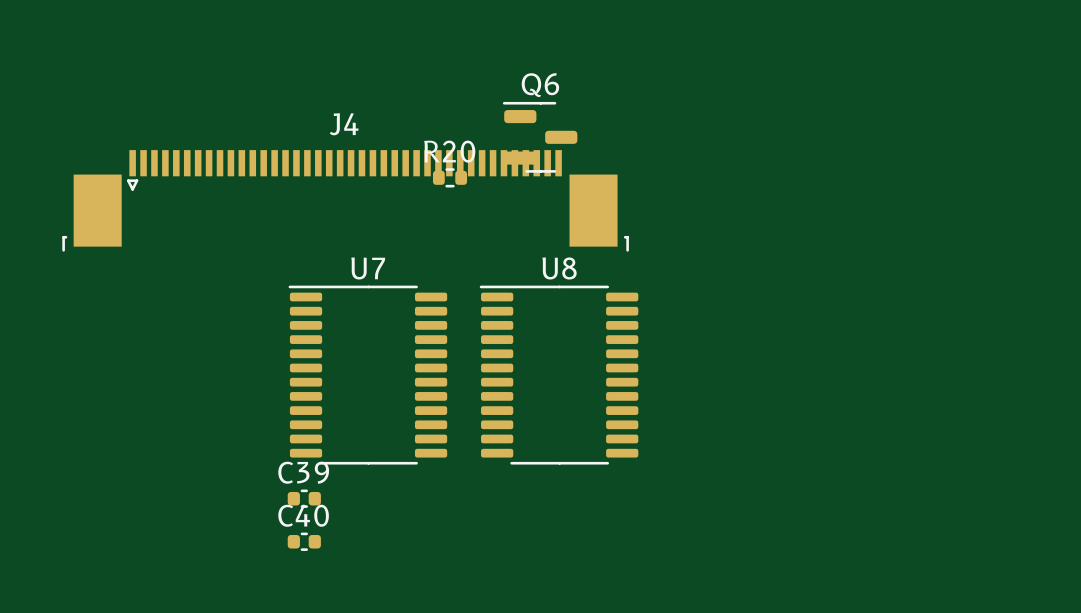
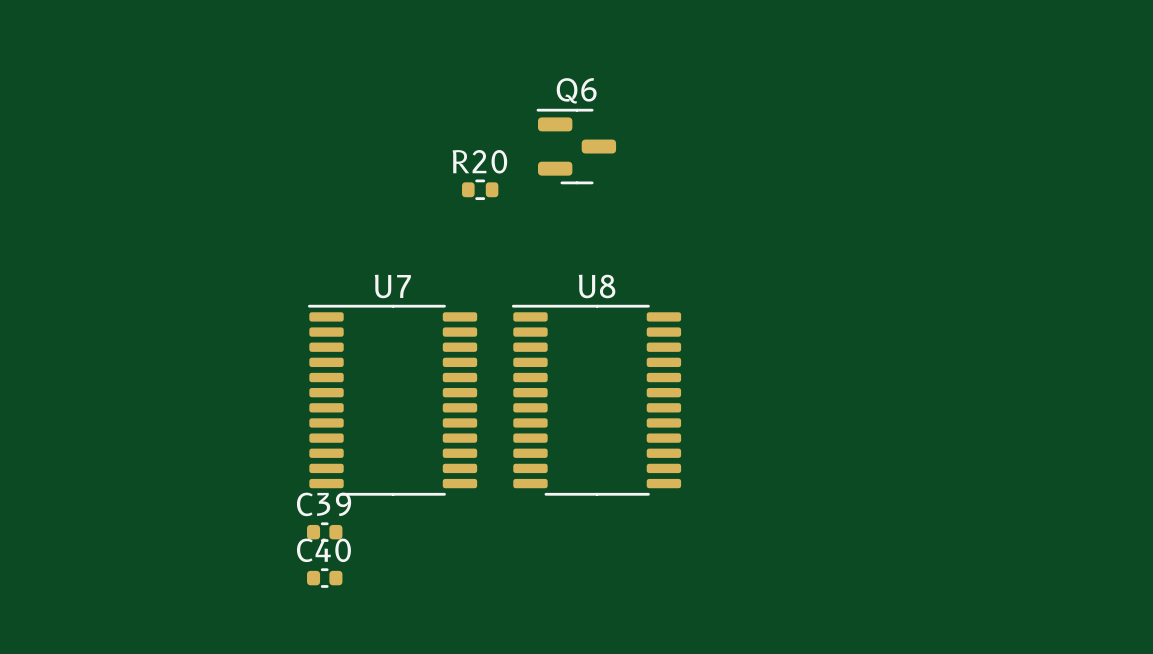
J4: (345, 200) -> none

